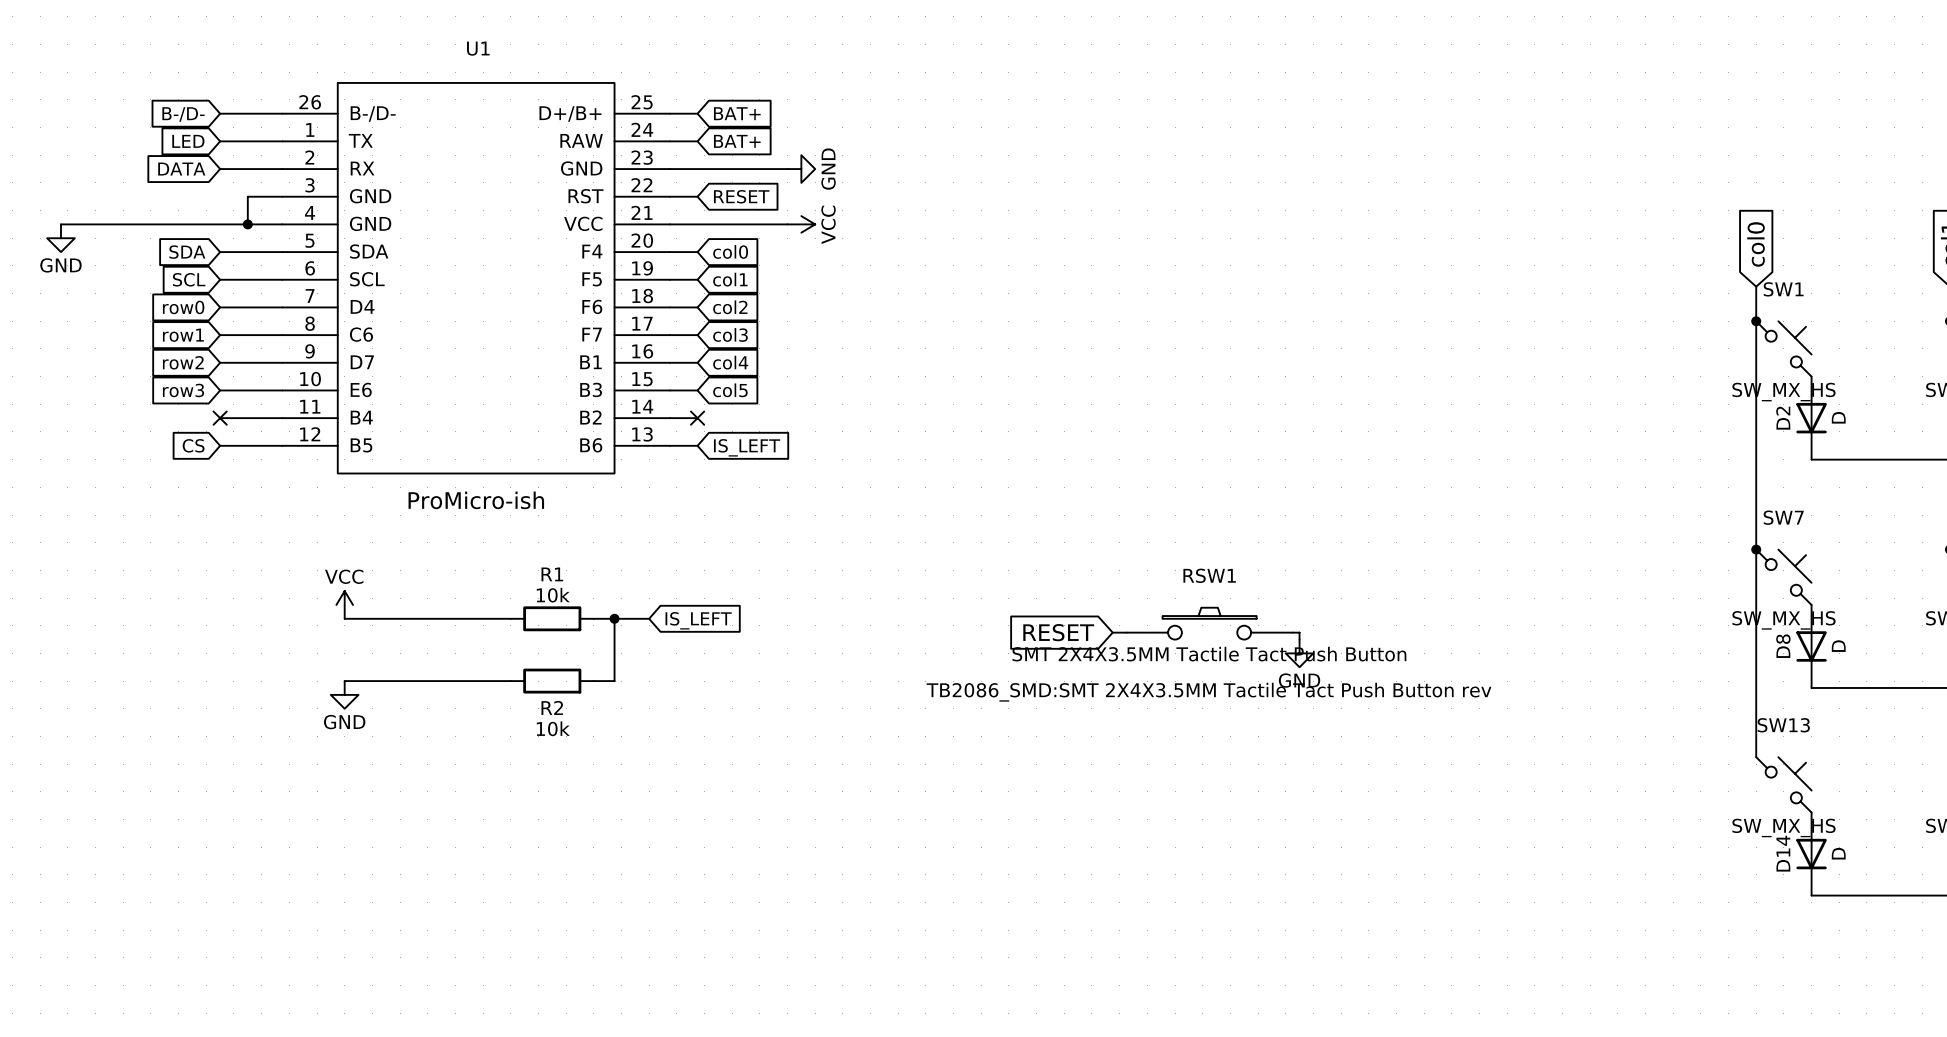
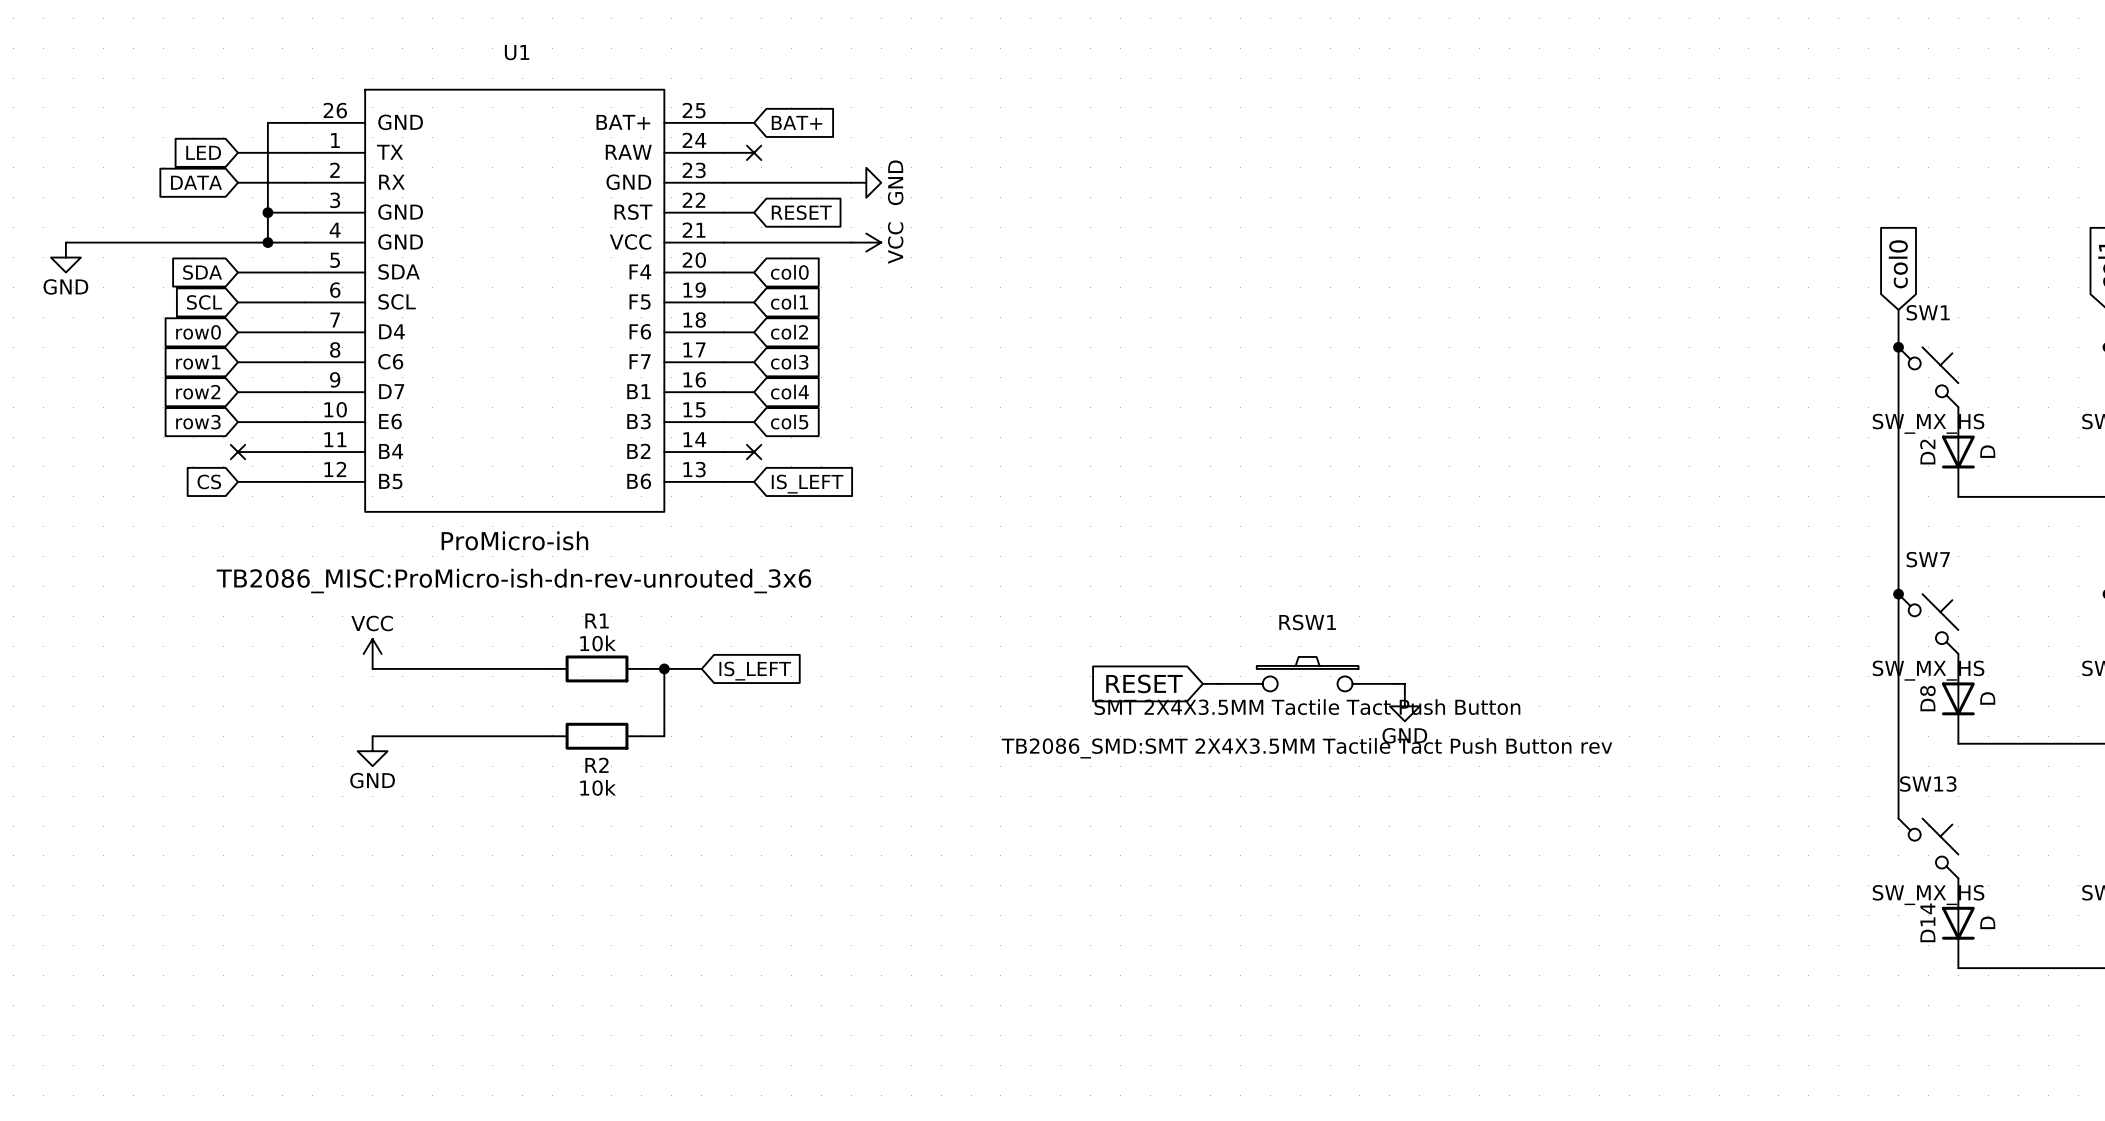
wire: (220, 113) (247, 113) -> (267, 212) (267, 122)
global label: B-/D- (183, 114) -> none
U1 pin name: B-/D- (373, 114) -> GND (400, 122)
U1 pin name: D+/B+ (570, 114) -> BAT+ (623, 122)
no-connect mark: none -> (754, 152)
global label: BAT+ (737, 141) -> none
junction: none -> (267, 212)
U1 text: none -> TB2086_MISC:ProMicro-ish-dn-rev-unrouted_3x6 (513, 581)

